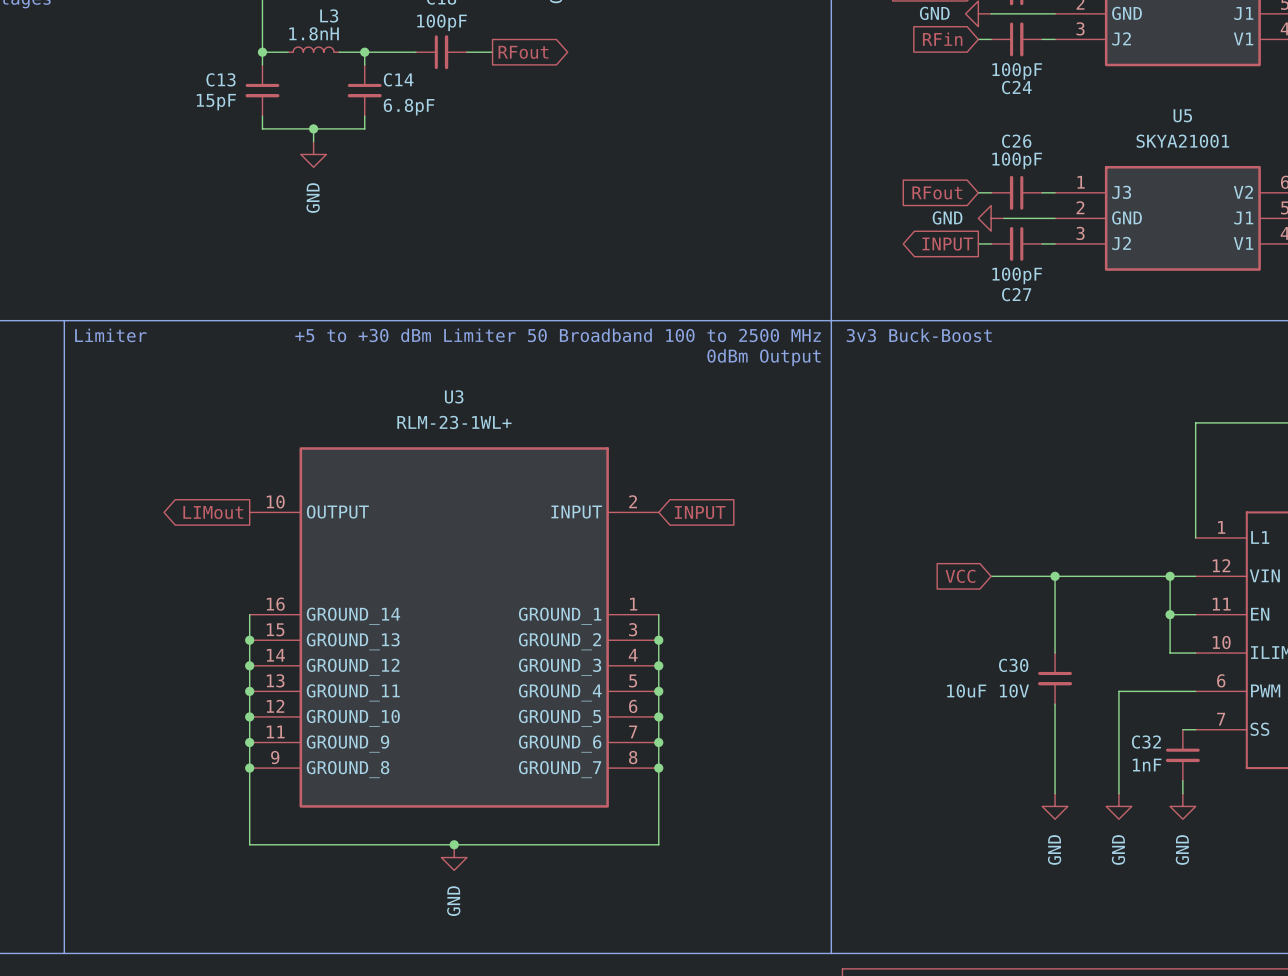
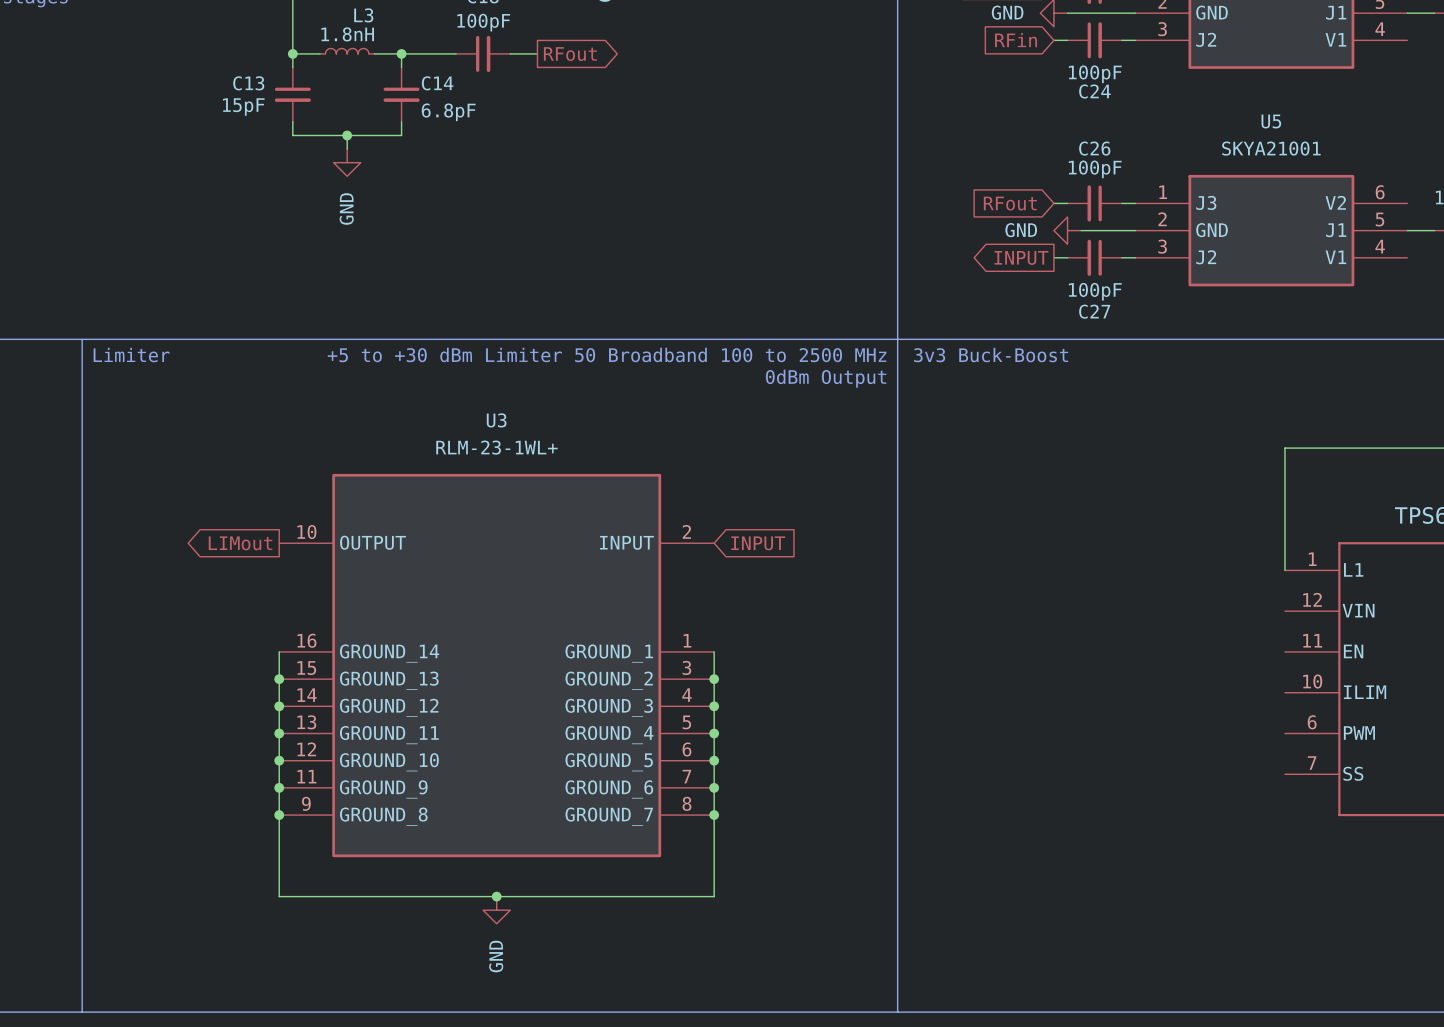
global label: VCC (960, 576) -> none
wire: (991, 576) (1195, 576) -> none
wire: (1055, 576) (1055, 653) -> none
junction: (1055, 576) -> none
wire: (1170, 576) (1170, 653) (1195, 653) -> none
junction: (1170, 576) -> none
wire: (1170, 614) (1195, 614) -> none
junction: (1170, 614) -> none
C30: 10uF 10V (1055, 678) -> none
wire: (1195, 691) (1118, 691) (1118, 793) -> none
wire: (1055, 704) (1055, 793) -> none
wire: (1182, 729) (1195, 729) -> none
C32: 1nF (1182, 755) -> none
wire: (1182, 780) (1182, 793) -> none
power symbol: GND (1055, 806) -> none
power symbol: GND (1118, 806) -> none
power symbol: GND (1182, 806) -> none

